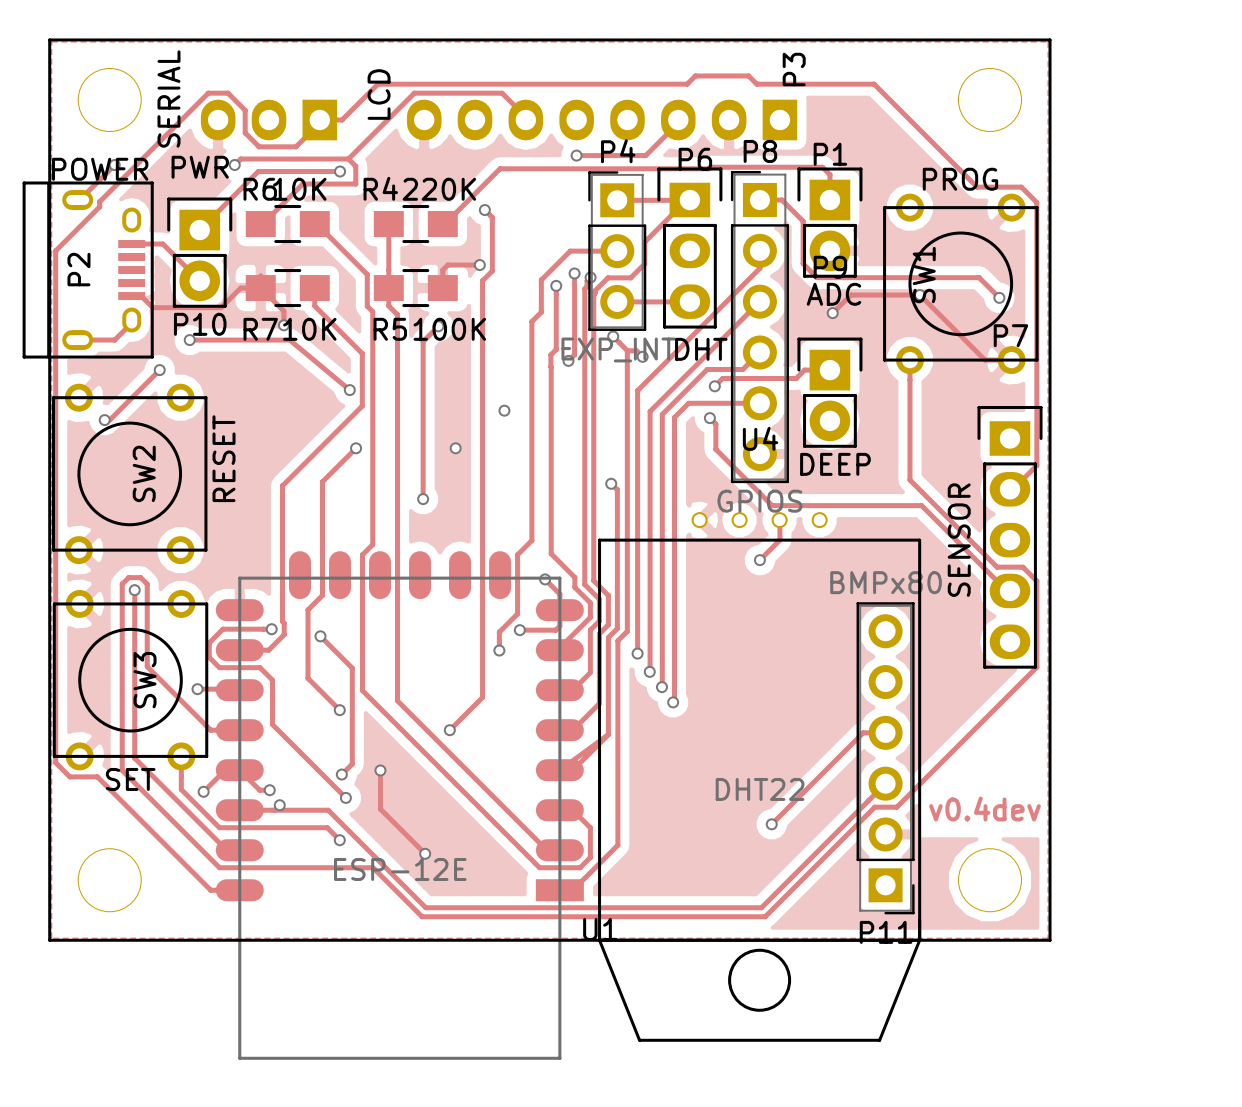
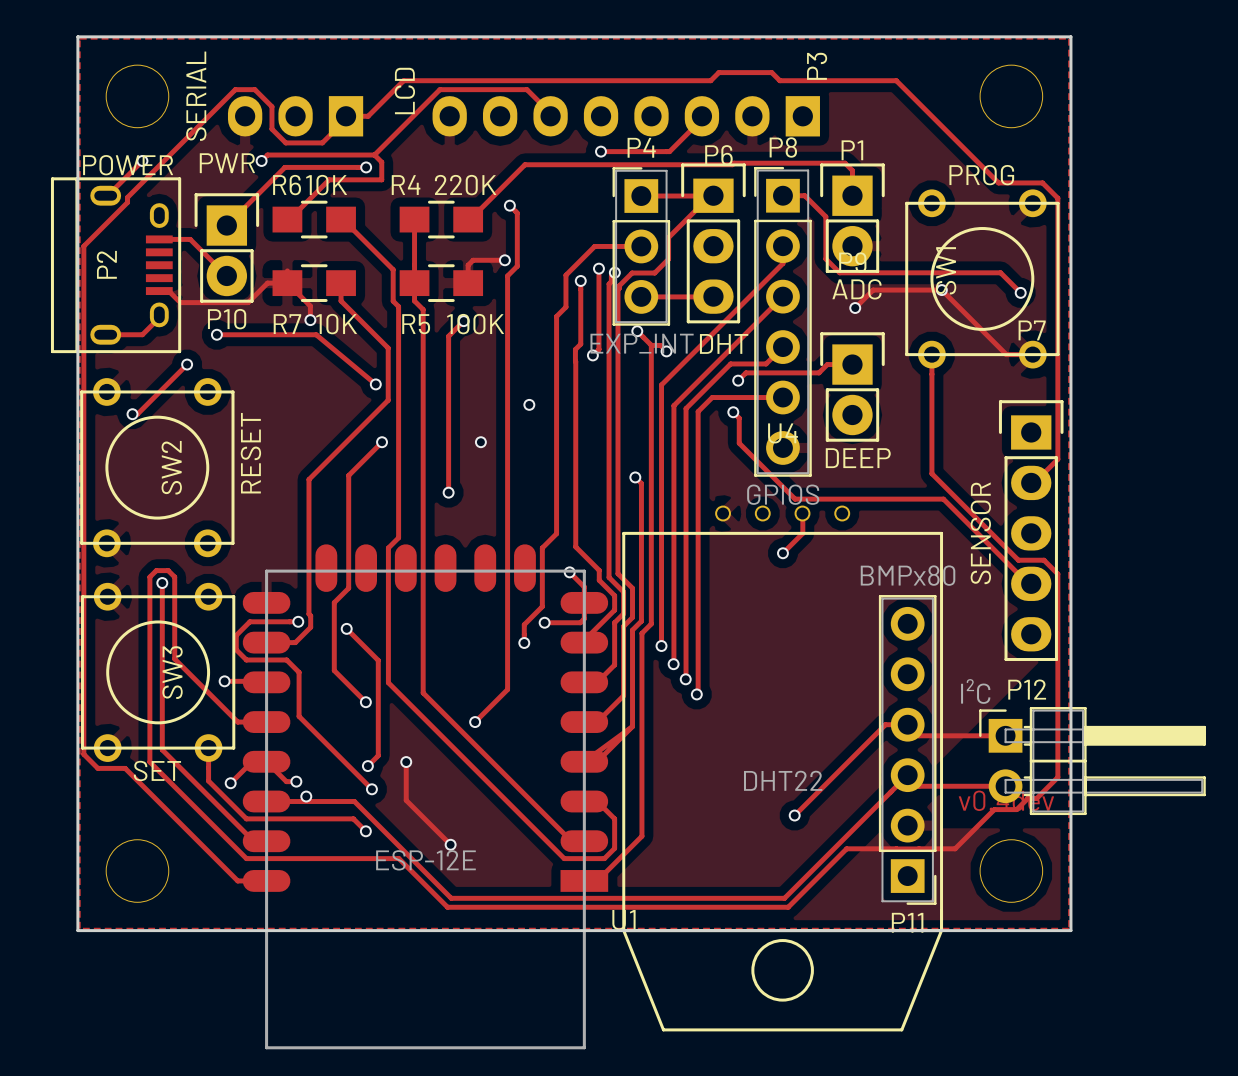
track: (1036, 667) (896, 807) (874, 807) (824, 857) -> (1057, 659) (1057, 777) (1036, 798) (1027, 798) (1016, 809) (994, 809) (955, 848) (919, 848)
track: none -> (907, 724) (918, 735) (1005, 735)
P12: none -> I²C (1092, 761)
track: none -> (907, 775) (918, 786) (1005, 786)
track: none -> (846, 848) (896, 848)
track: none -> (896, 848) (918, 848)

